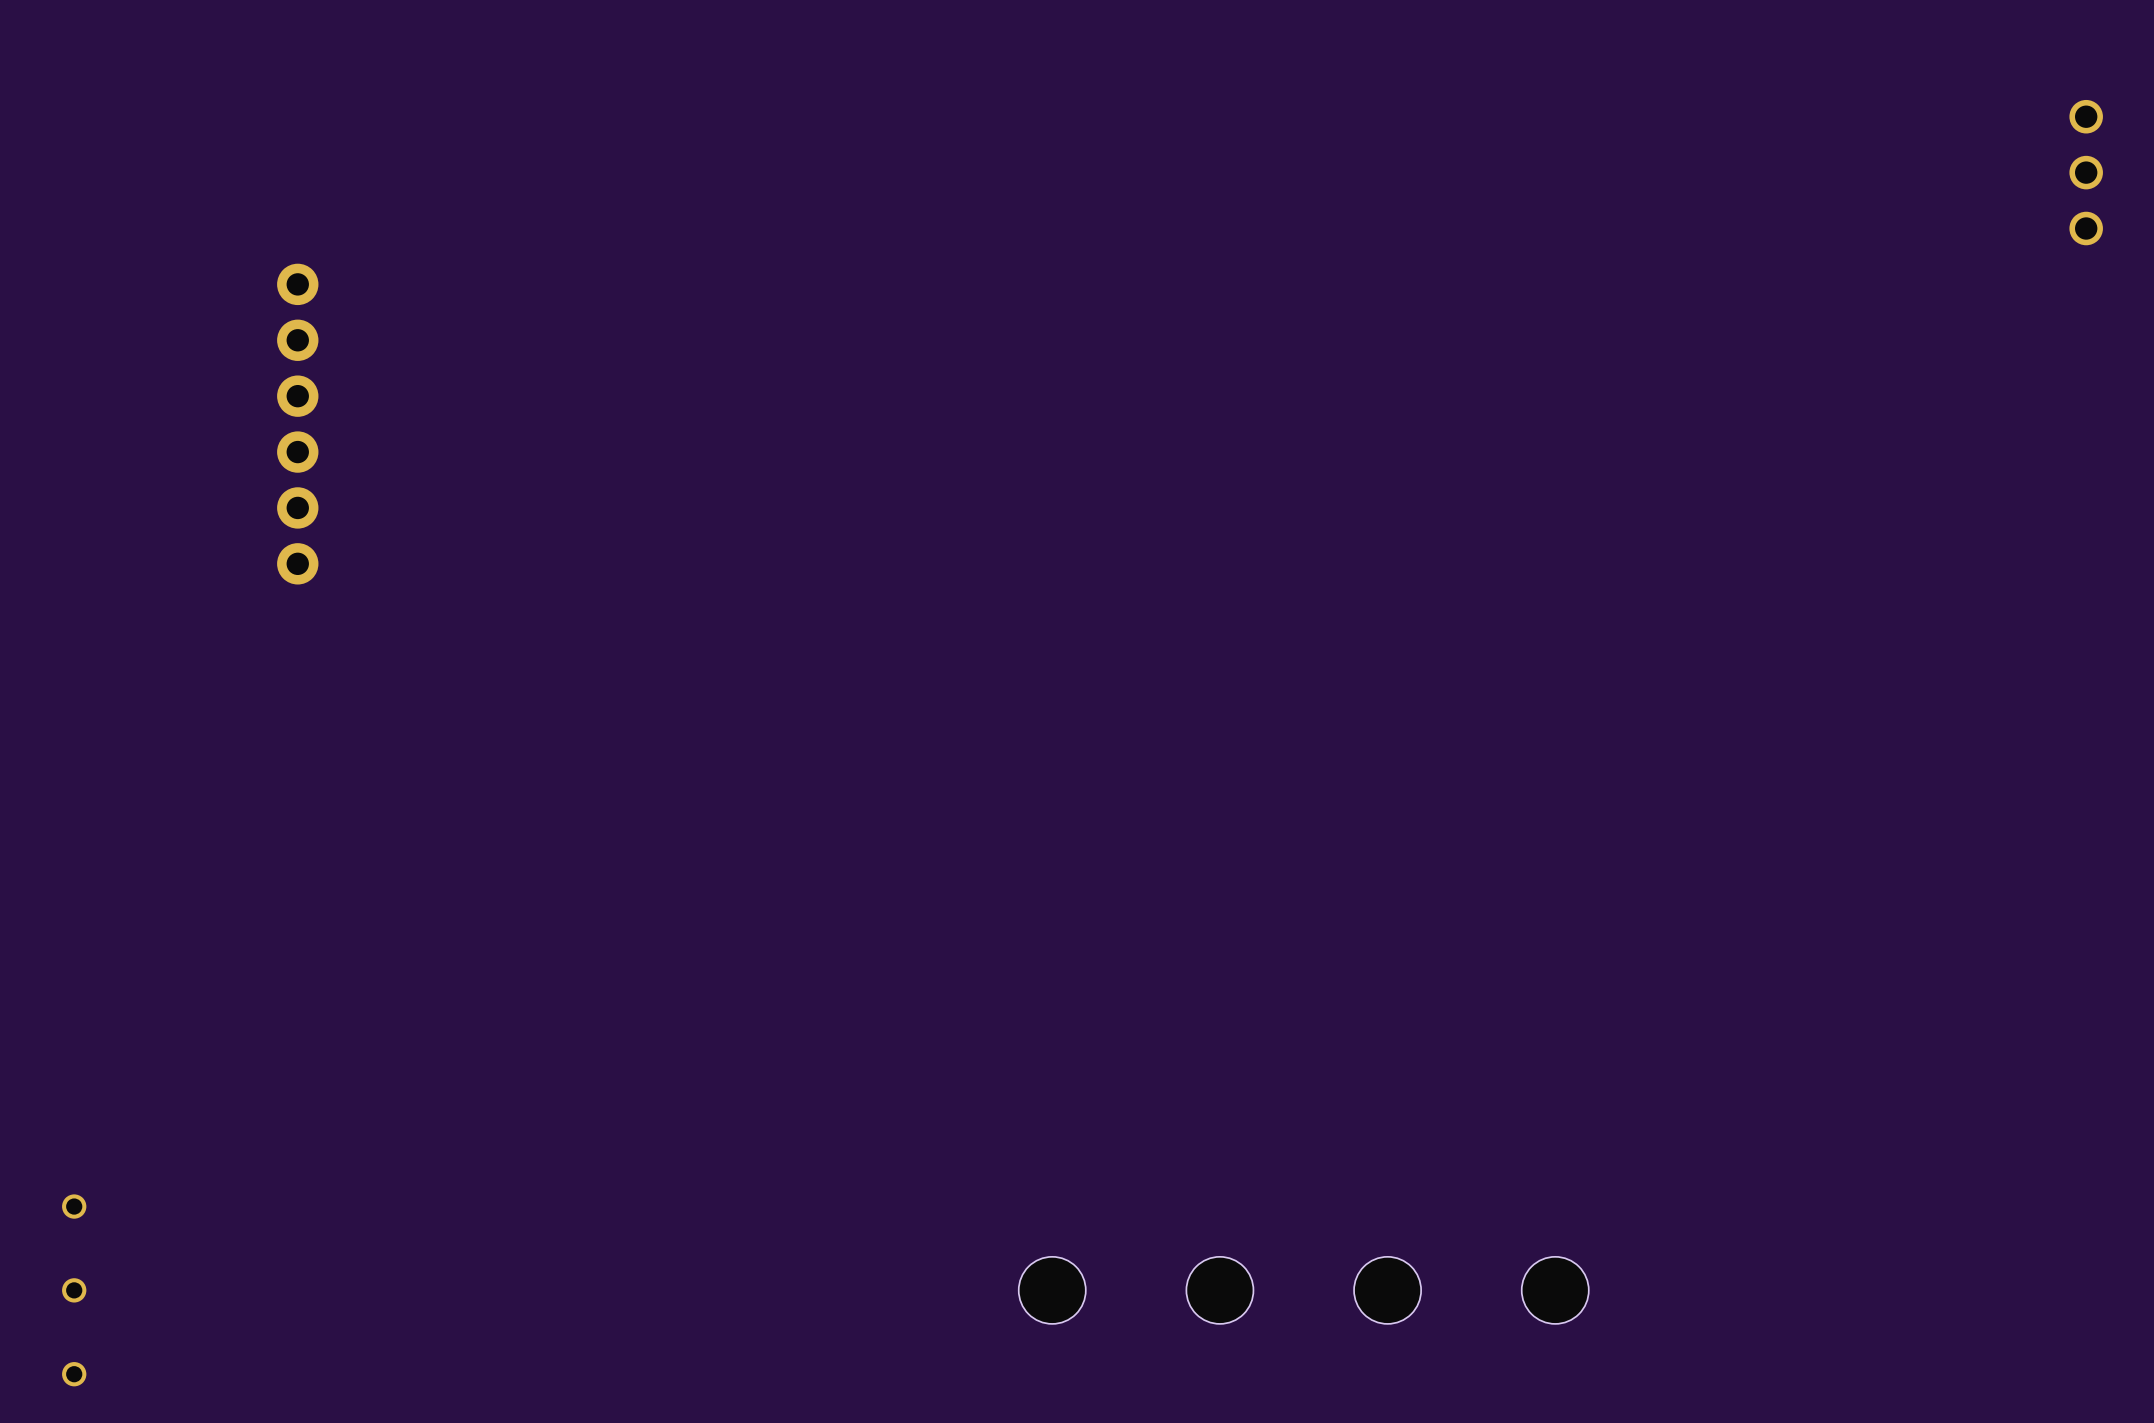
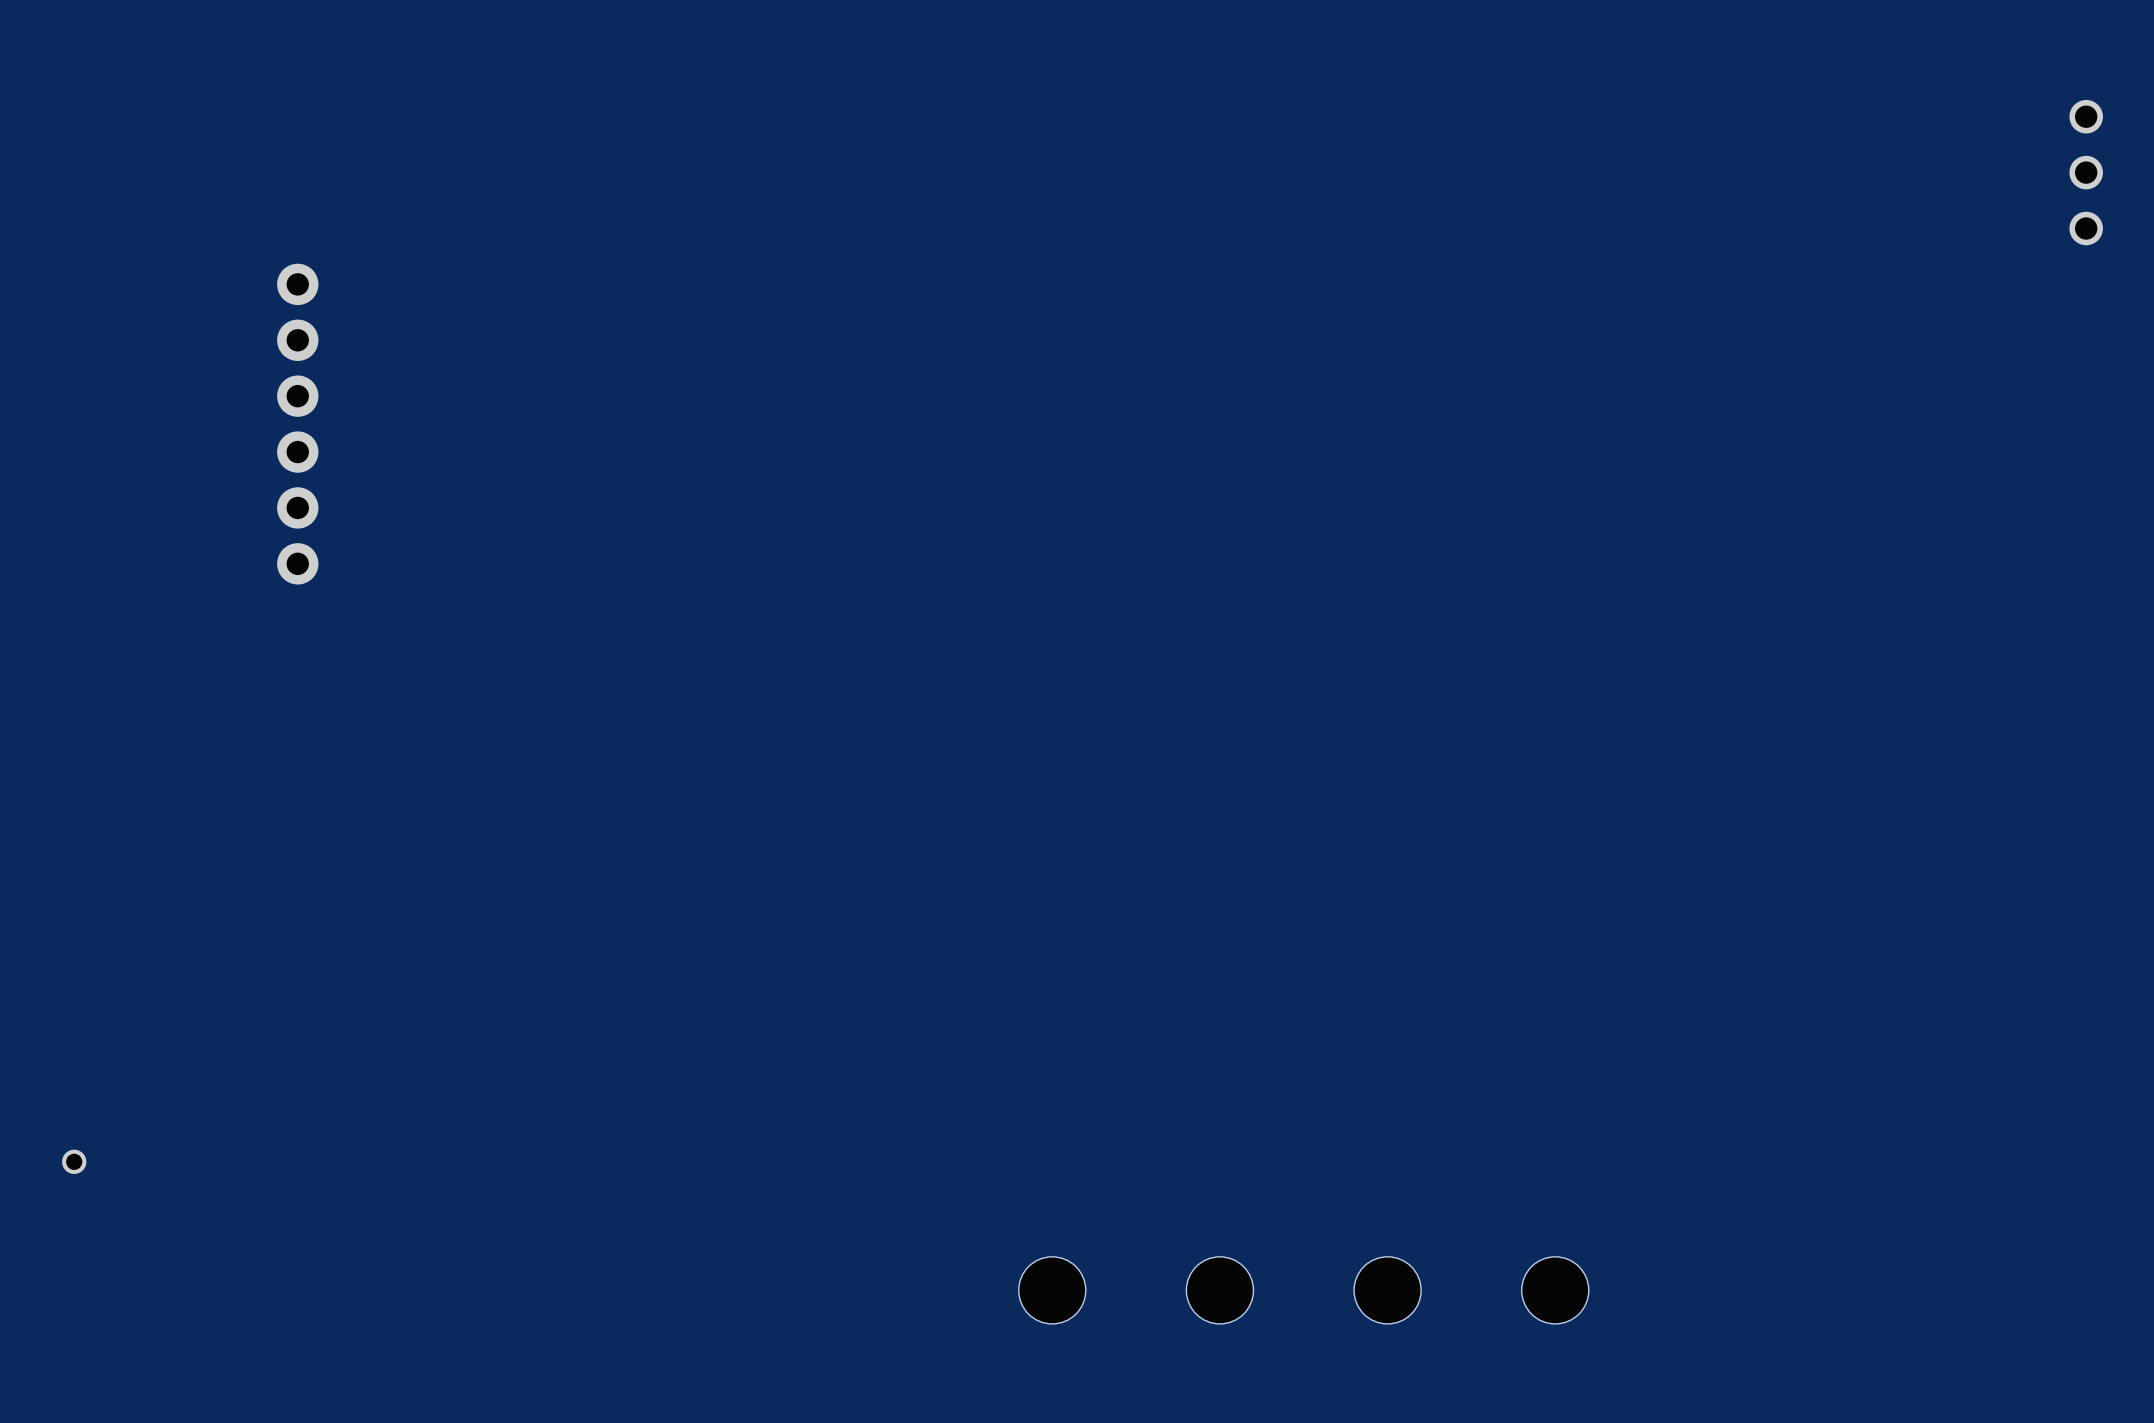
part position: (74, 1206) -> (74, 1161)
part: (74, 1290) -> none
part: (74, 1374) -> none

